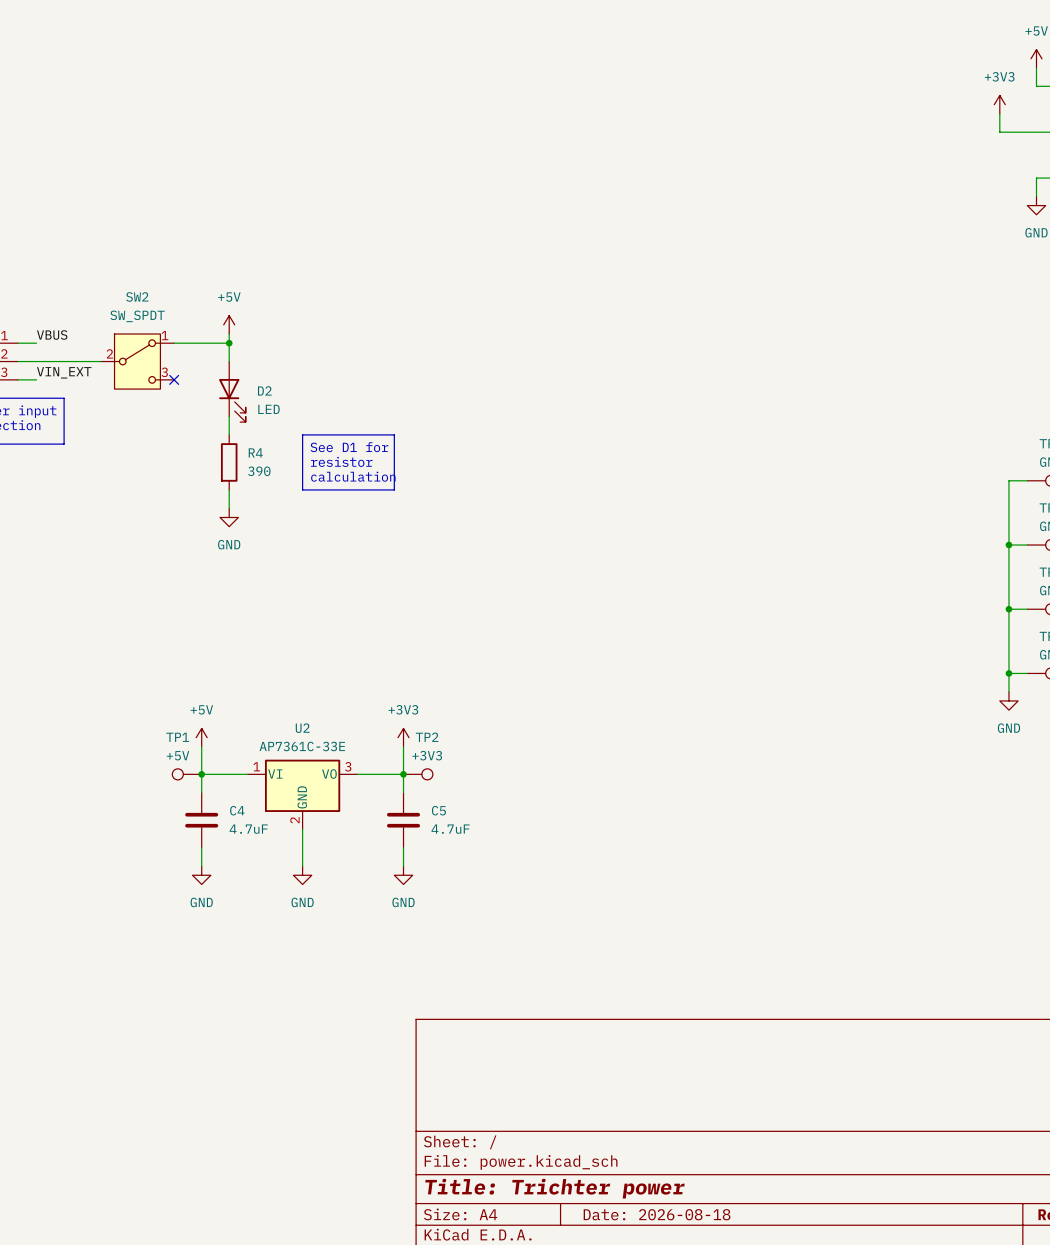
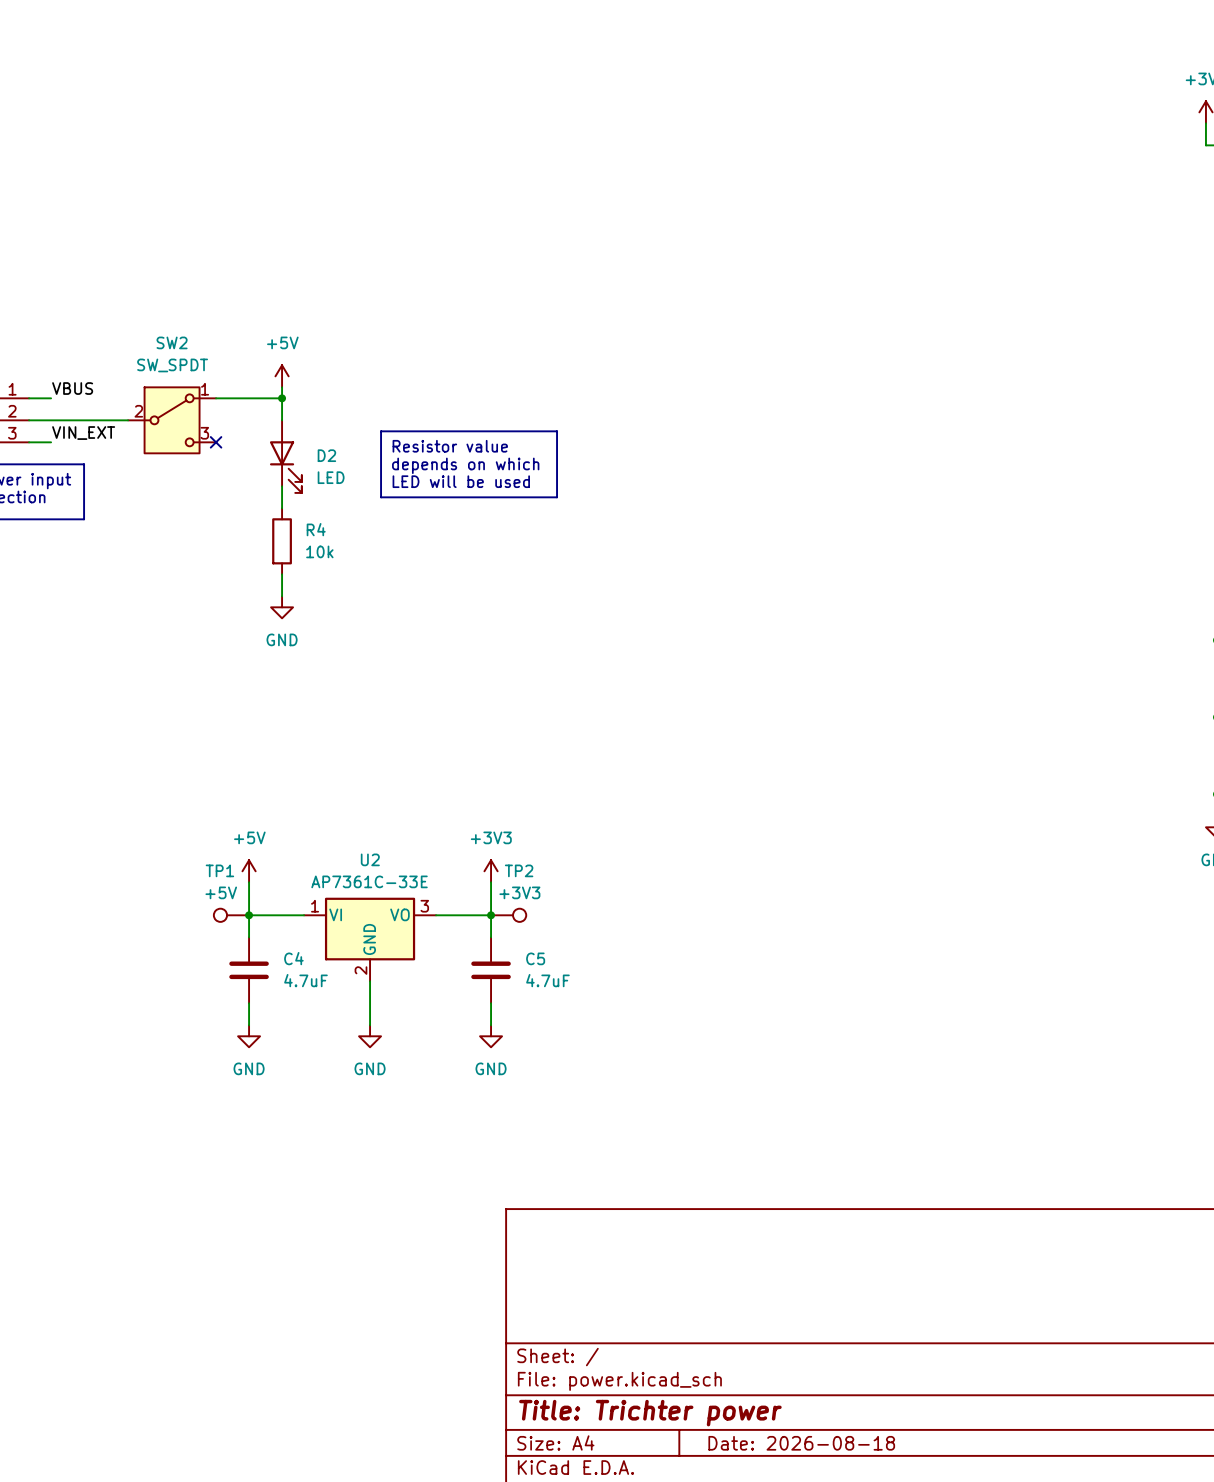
line: none -> (381, 431) (557, 431) (557, 497) (381, 497) (381, 431)
text: none -> Resistor value (450, 446)
text: none -> depends on which (465, 465)
text: none -> LED will be used (461, 481)
line: (302, 434) (394, 434) (394, 489) (302, 489) (302, 434) -> none
text: See D1 for (349, 447) -> none
text: resistor (341, 461) -> none
R4 value: 390 (259, 471) -> 10k (319, 551)
text: calculation (353, 476) -> none

